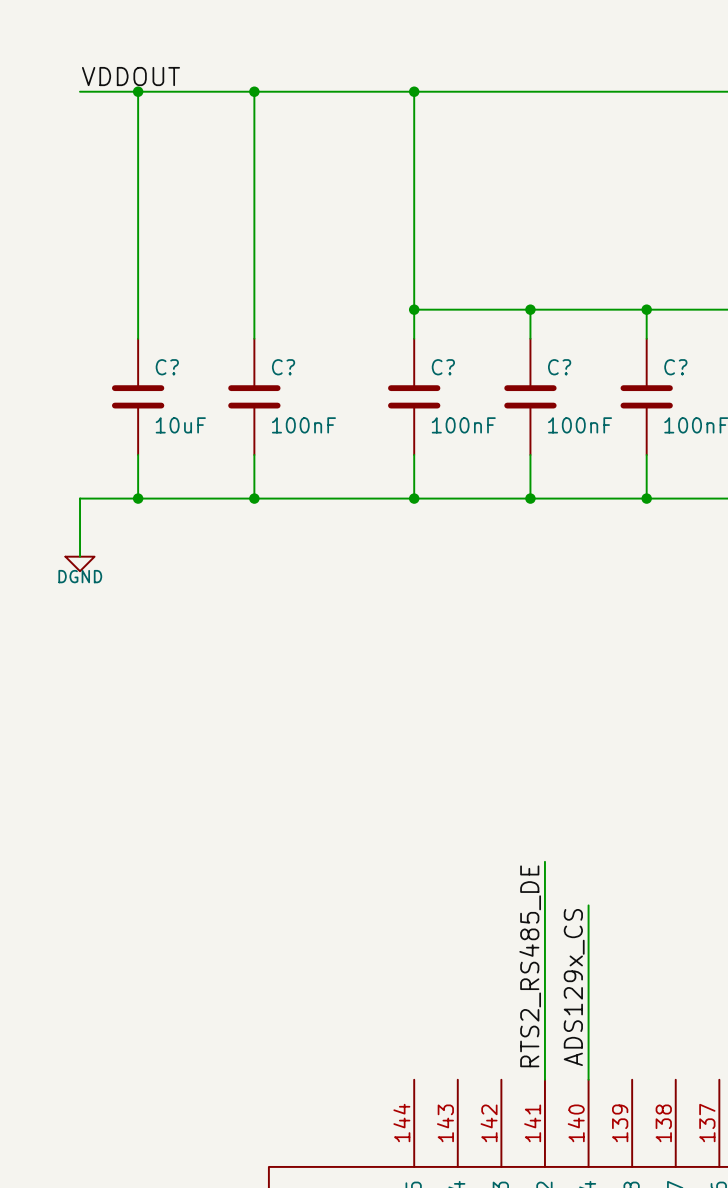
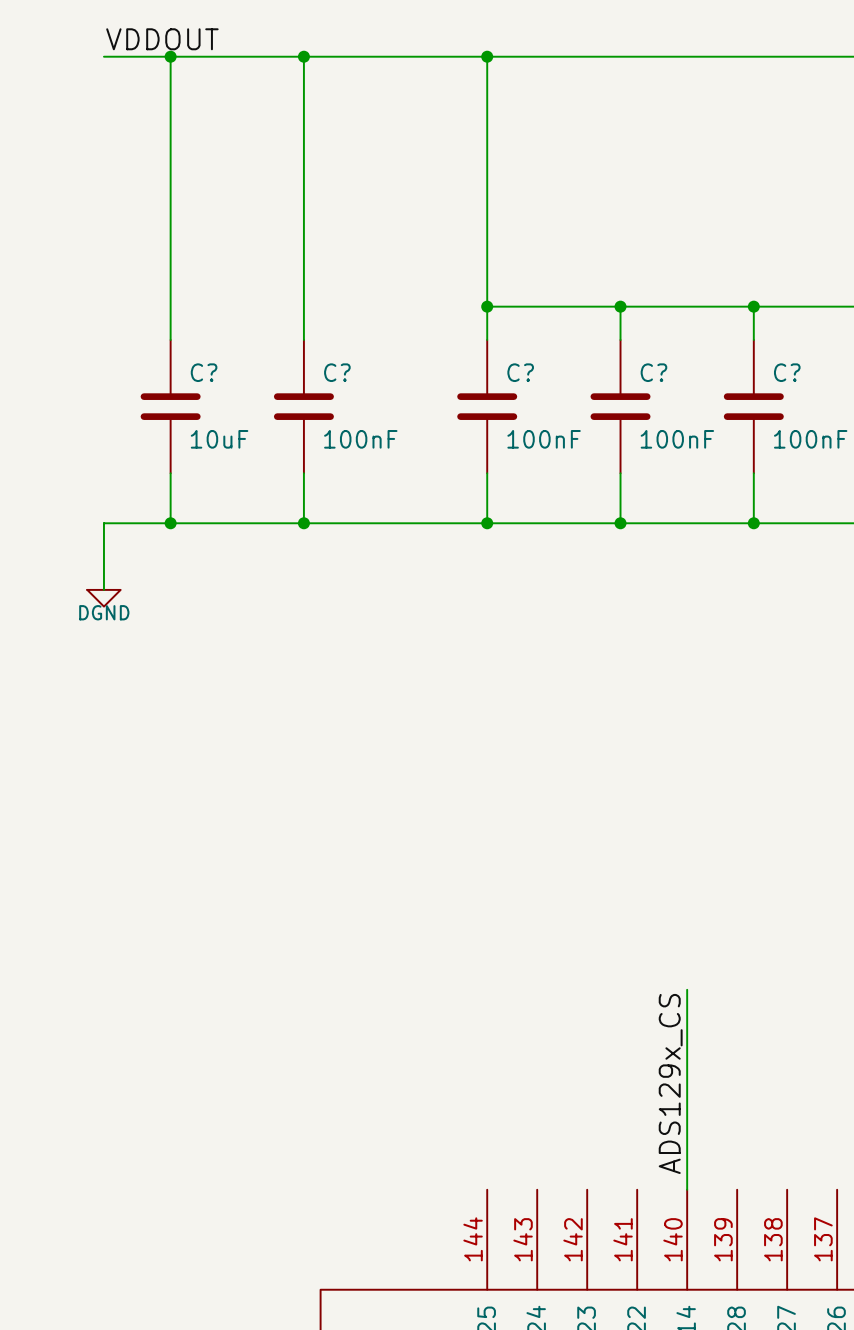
wire: (544, 861) (544, 1079) -> none
label: RTS2_RS485_DE (530, 966) -> none

